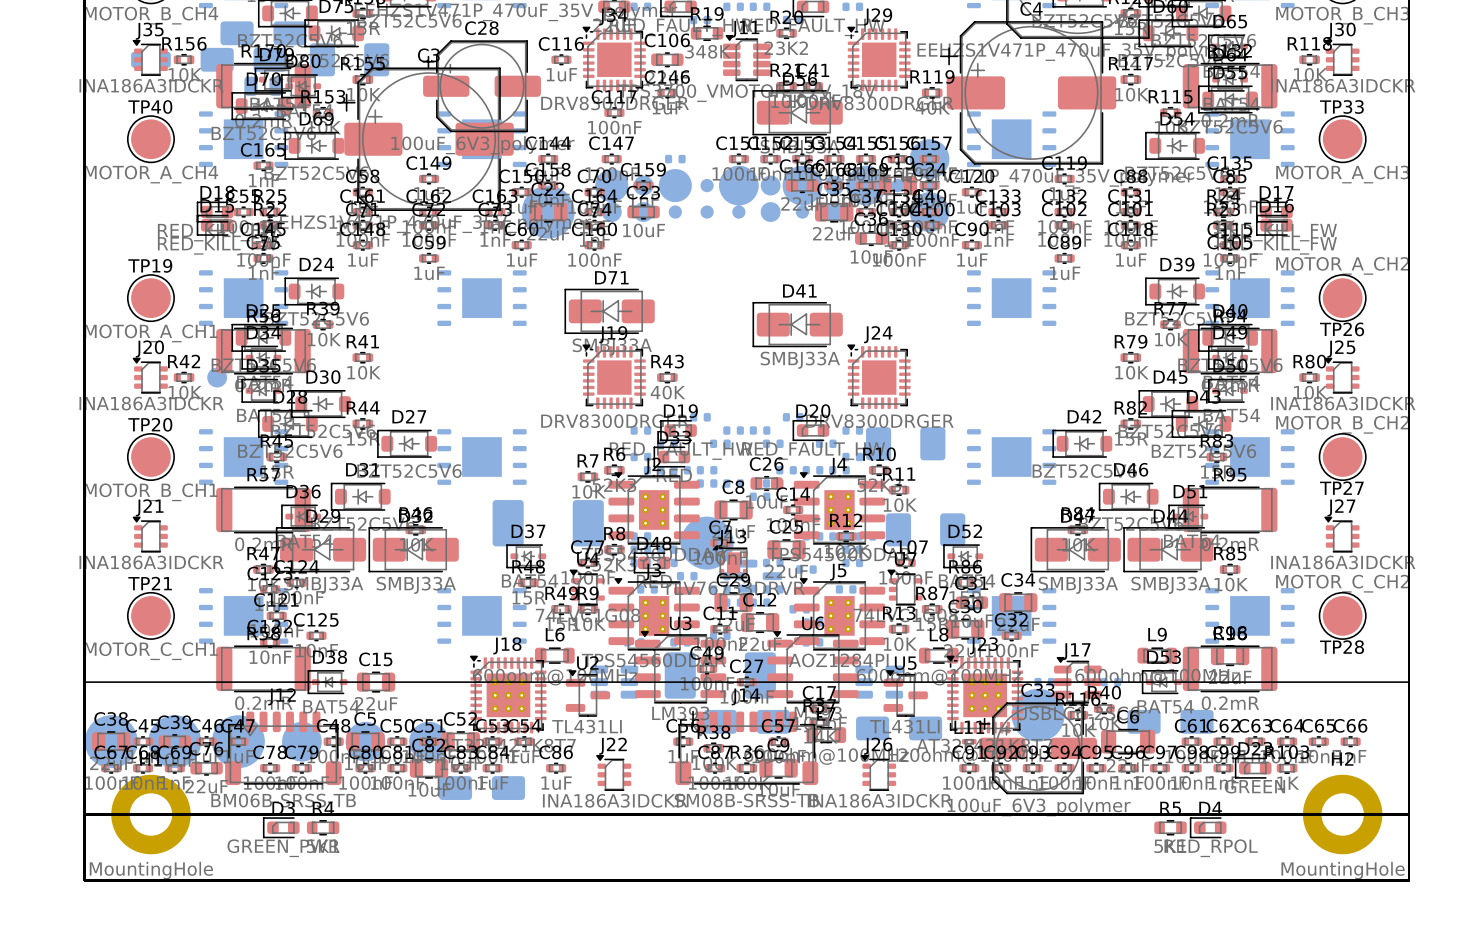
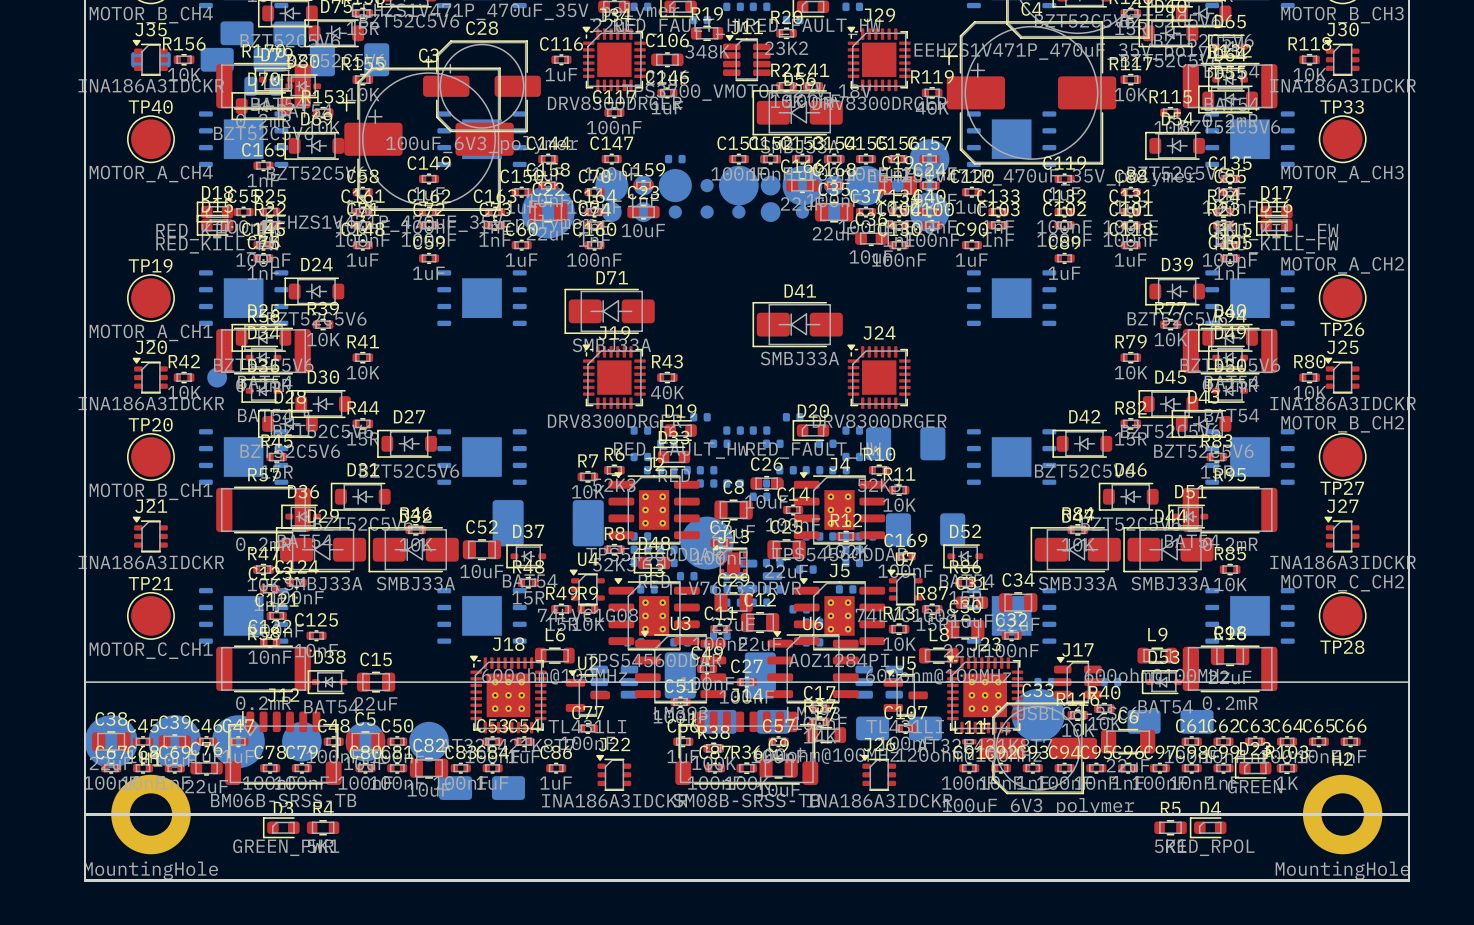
C169 position: (865, 185) -> (905, 556)
C77 position: (587, 562) -> (587, 728)
C107 position: (905, 562) -> (905, 728)
C51 position: (429, 741) -> (680, 701)
C52 position: (460, 741) -> (481, 549)

